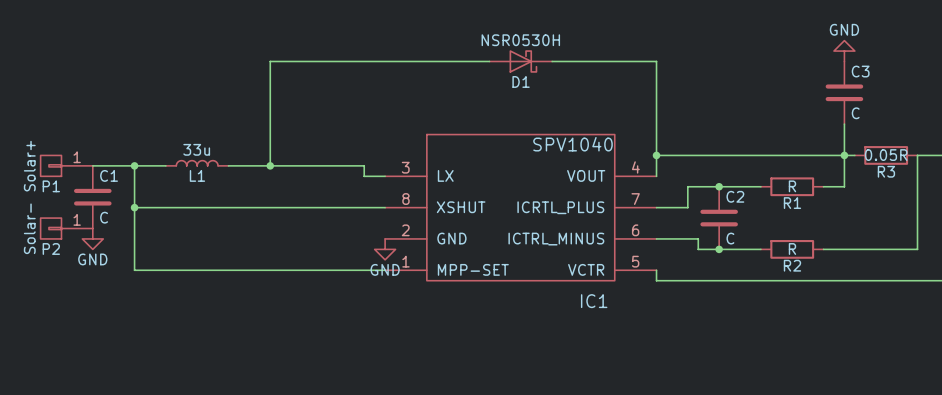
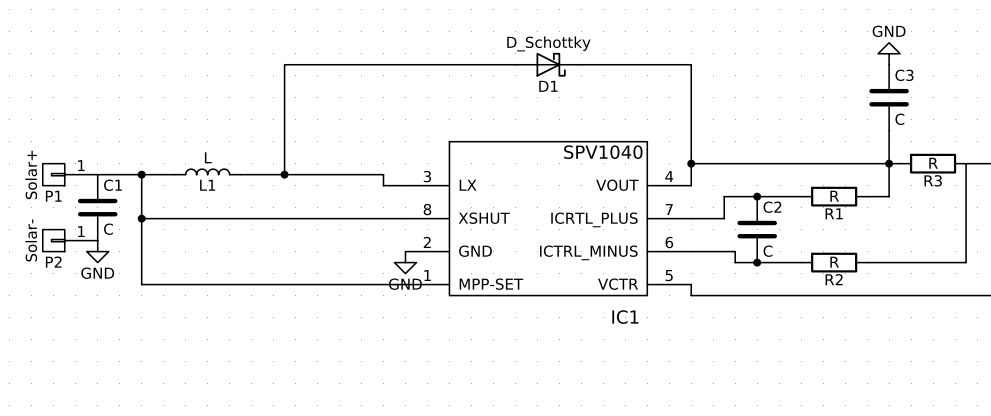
D1 value: NSR0530H (520, 40) -> D_Schottky (548, 43)
L1 value: 33u (196, 149) -> L (208, 157)
R3 value: 0.05R (886, 155) -> R (933, 163)

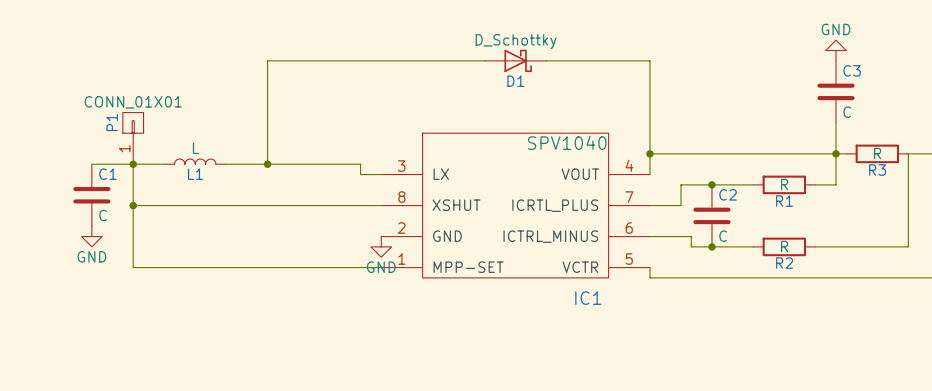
P1 value: Solar+ (31, 174) -> CONN_01X01 (133, 102)
P1 rotation: 0° (53, 174) -> 90° clockwise (133, 122)
P1 position: (70, 174) -> (133, 138)
P2: Solar- (70, 240) -> none

